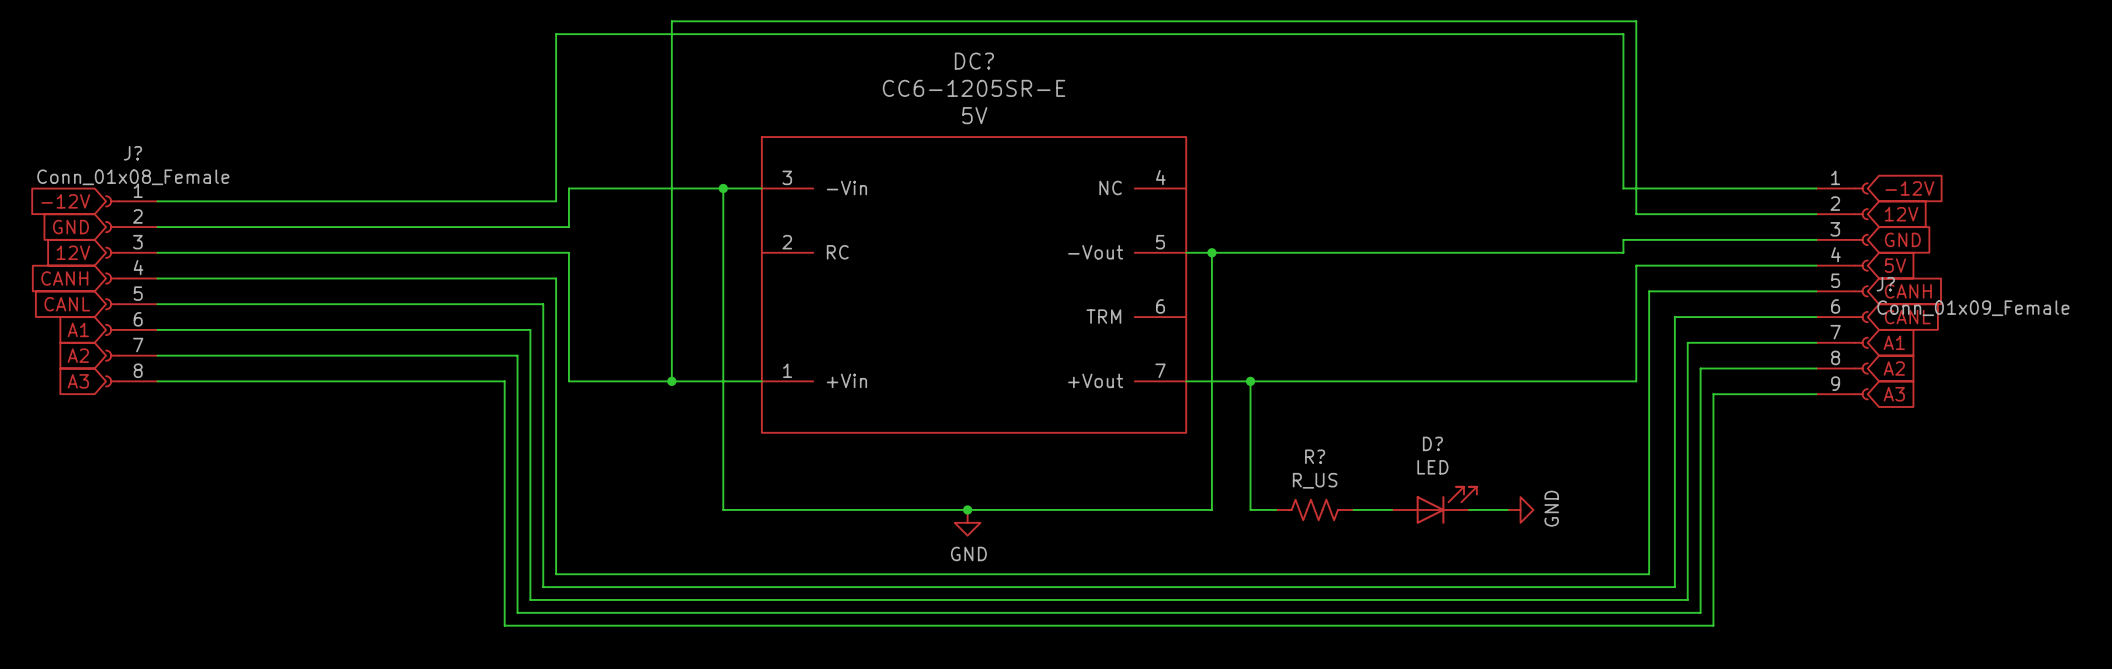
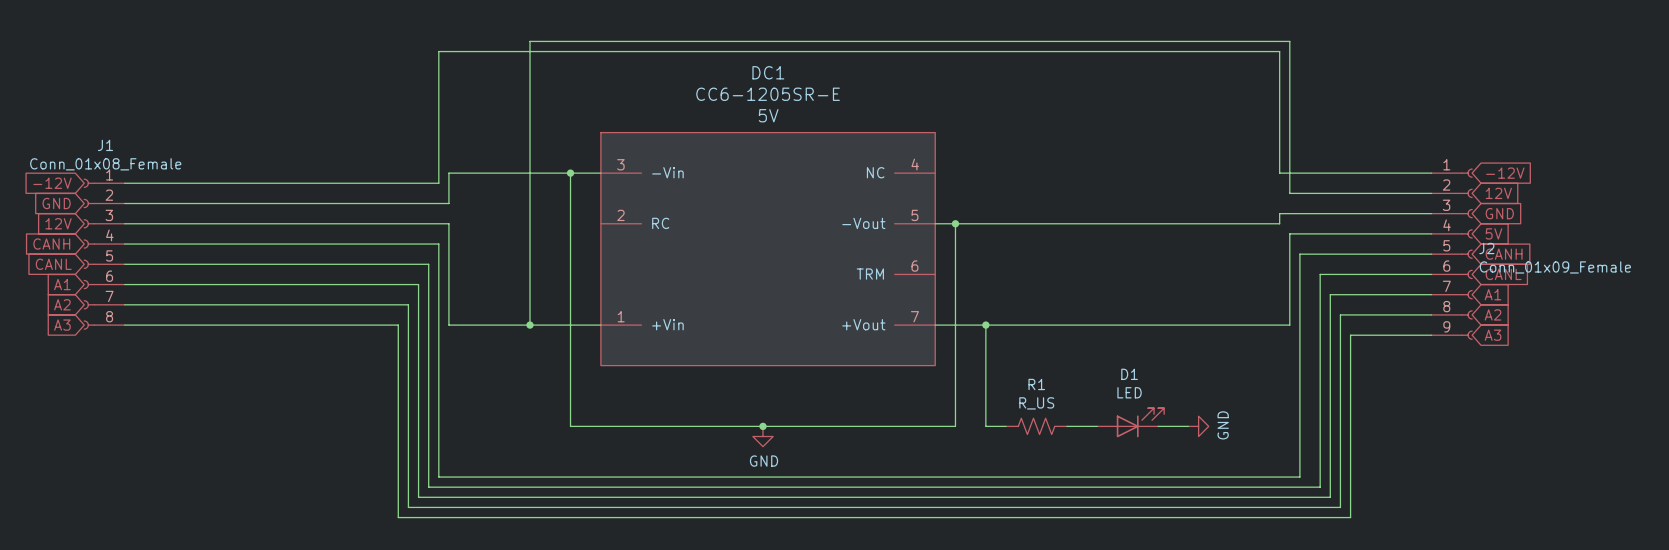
DC? name: DC? (974, 61) -> DC1 (768, 72)
J? name: J? (133, 153) -> J1 (105, 145)
J? name: J? (1885, 284) -> J2 (1486, 248)
D? name: D? (1432, 443) -> D1 (1129, 374)
R? name: R? (1315, 456) -> R1 (1036, 384)

